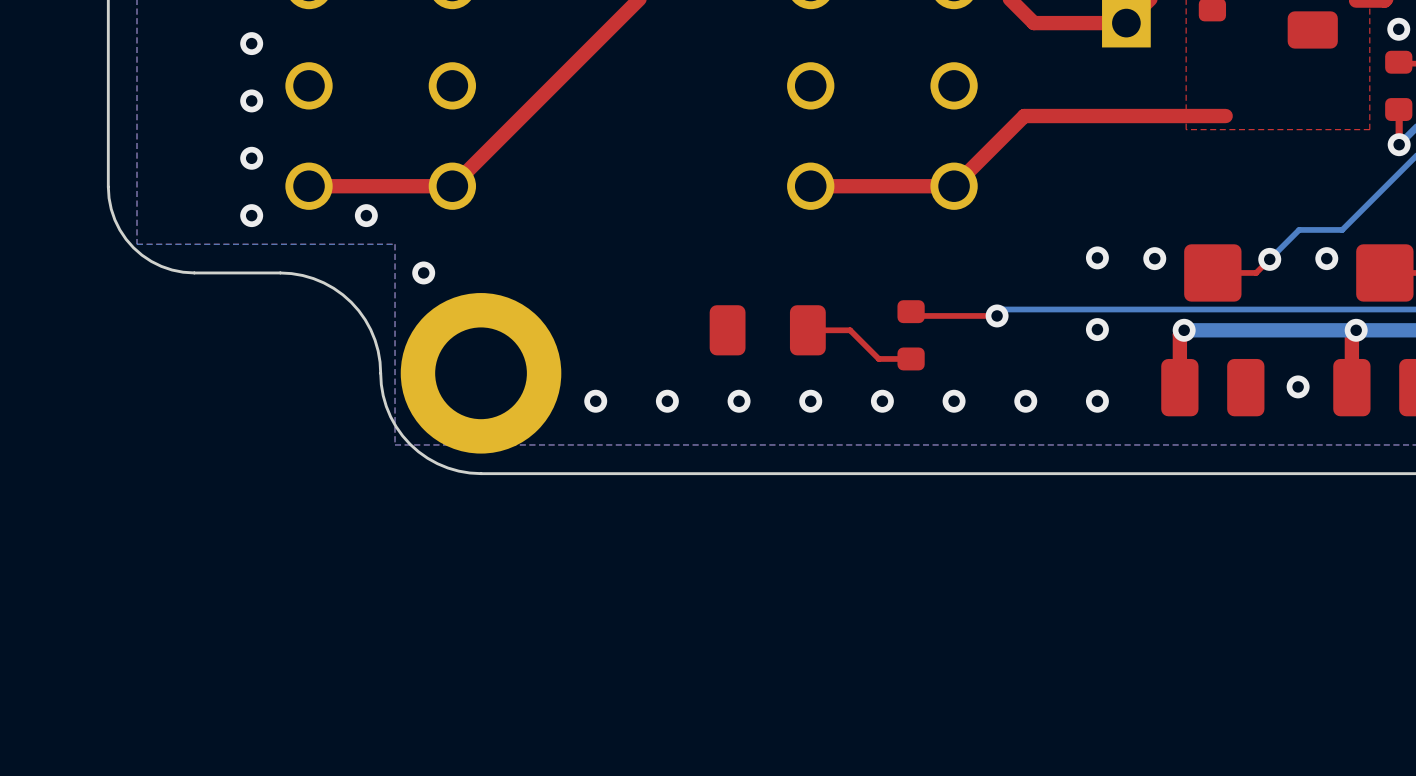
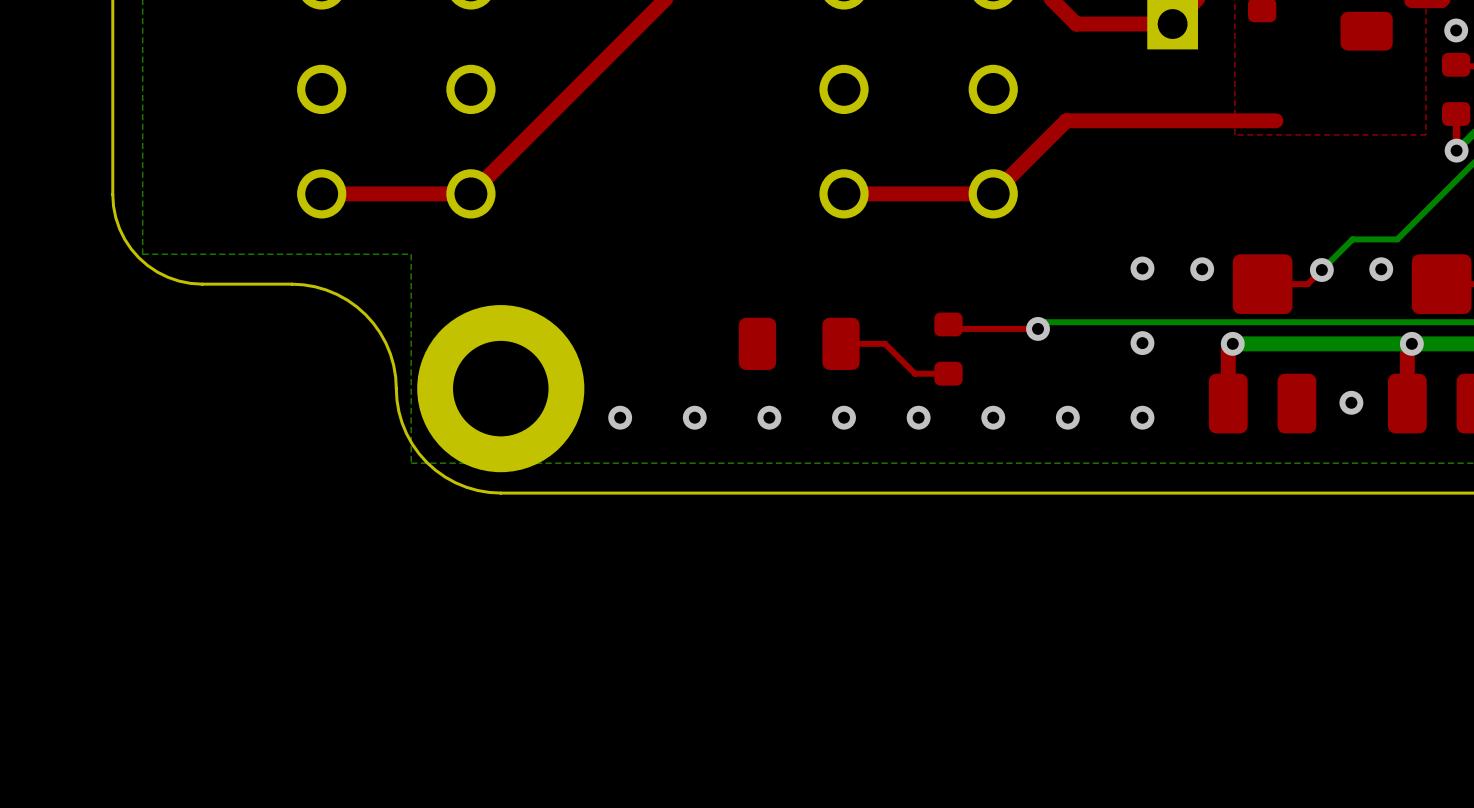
via: (251, 43) -> none
via: (251, 100) -> none
via: (251, 158) -> none
via: (251, 215) -> none
via: (366, 215) -> none
via: (423, 272) -> none

